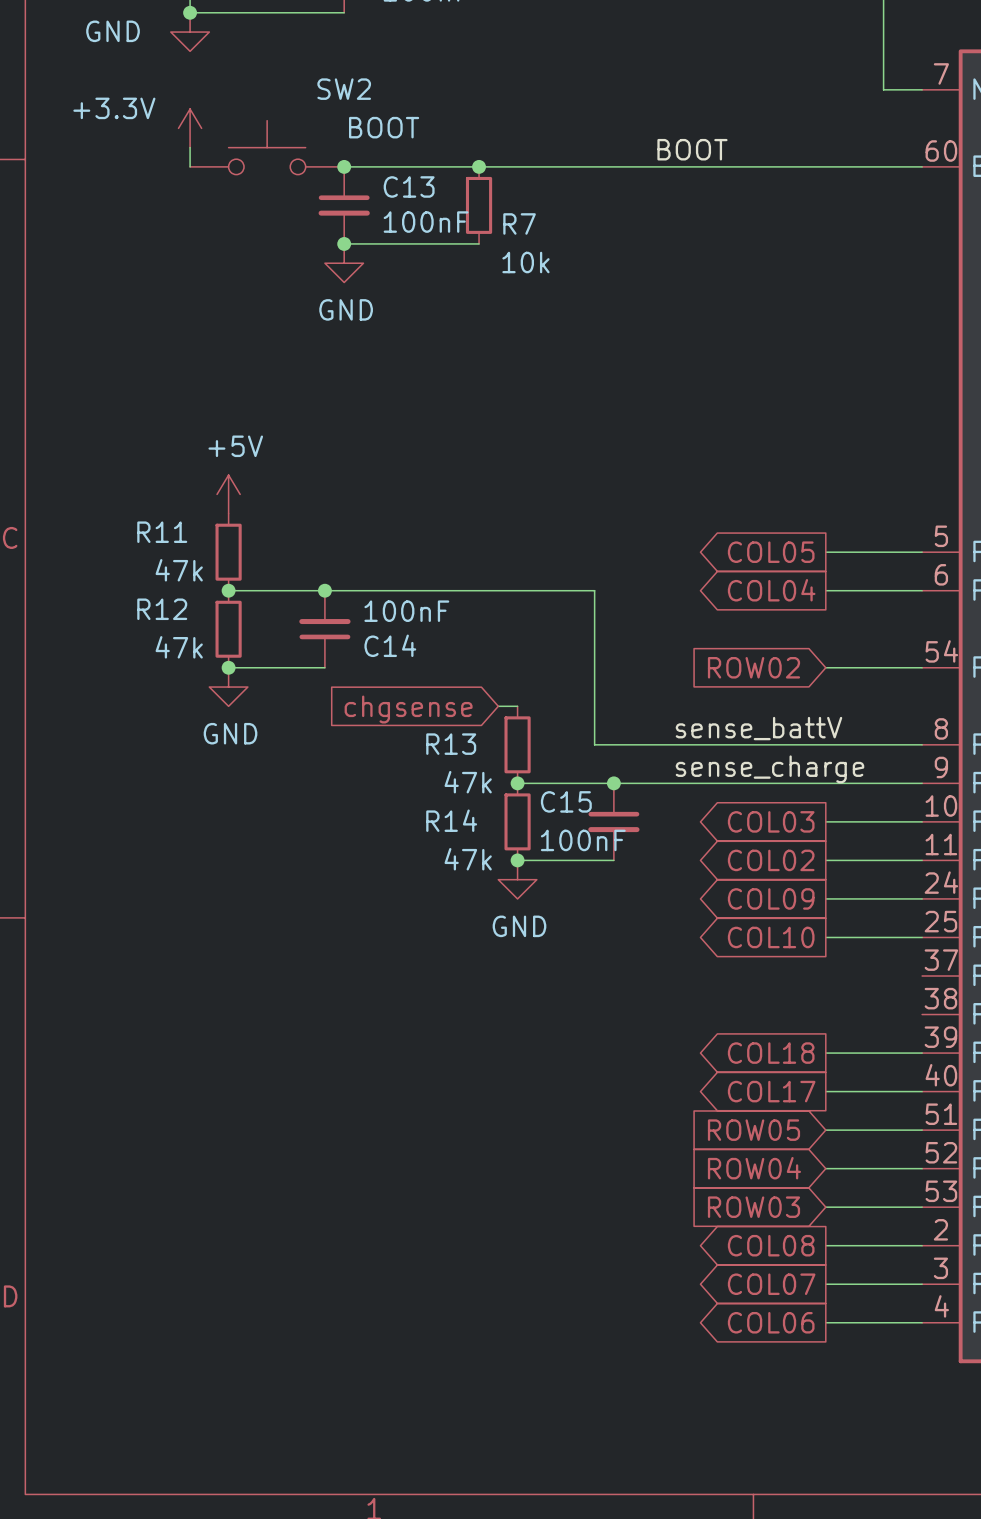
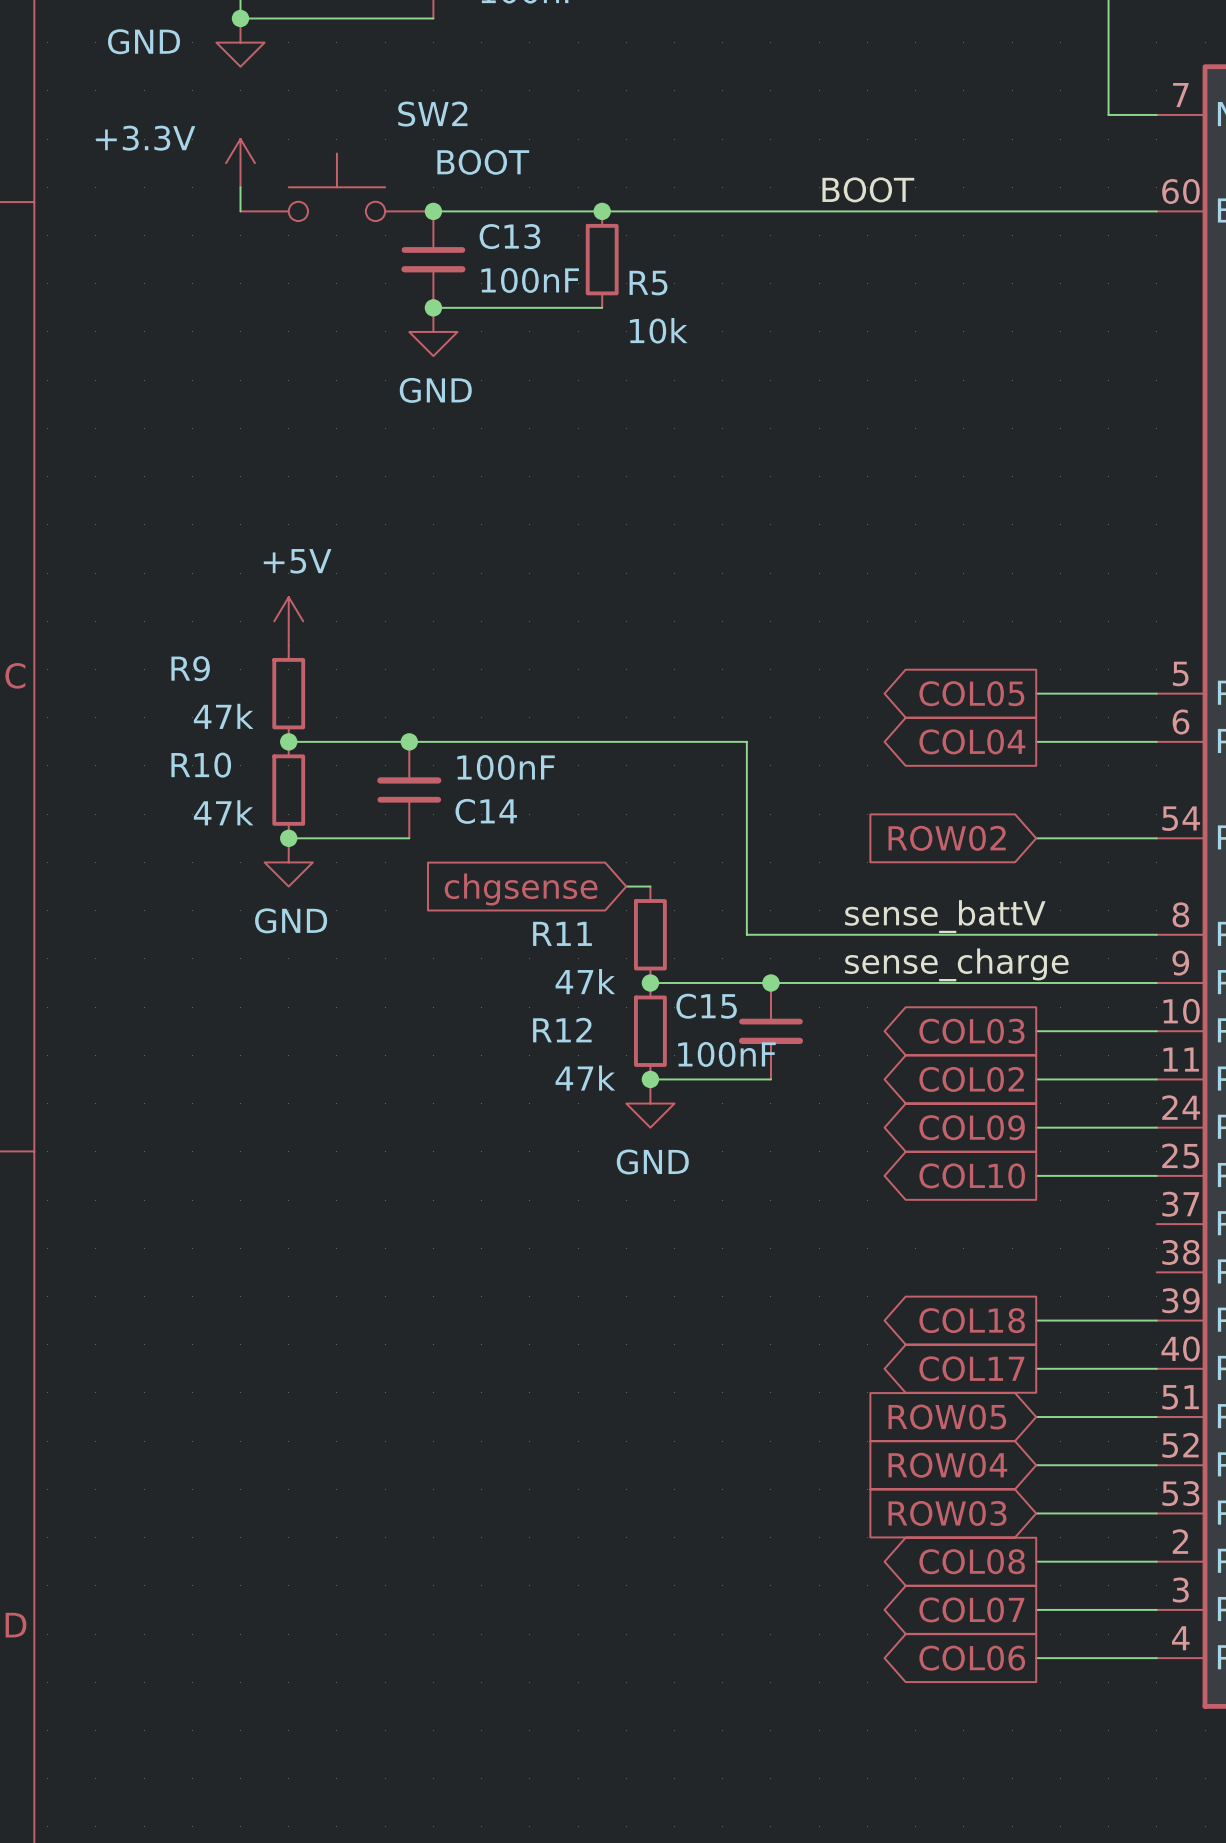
R7 name: R7 (519, 223) -> R5 (648, 283)
R11 name: R11 (162, 532) -> R9 (190, 668)
R12 name: R12 (162, 609) -> R10 (201, 765)
R13 name: R13 (451, 744) -> R11 (562, 933)
R14 name: R14 (451, 820) -> R12 (562, 1030)

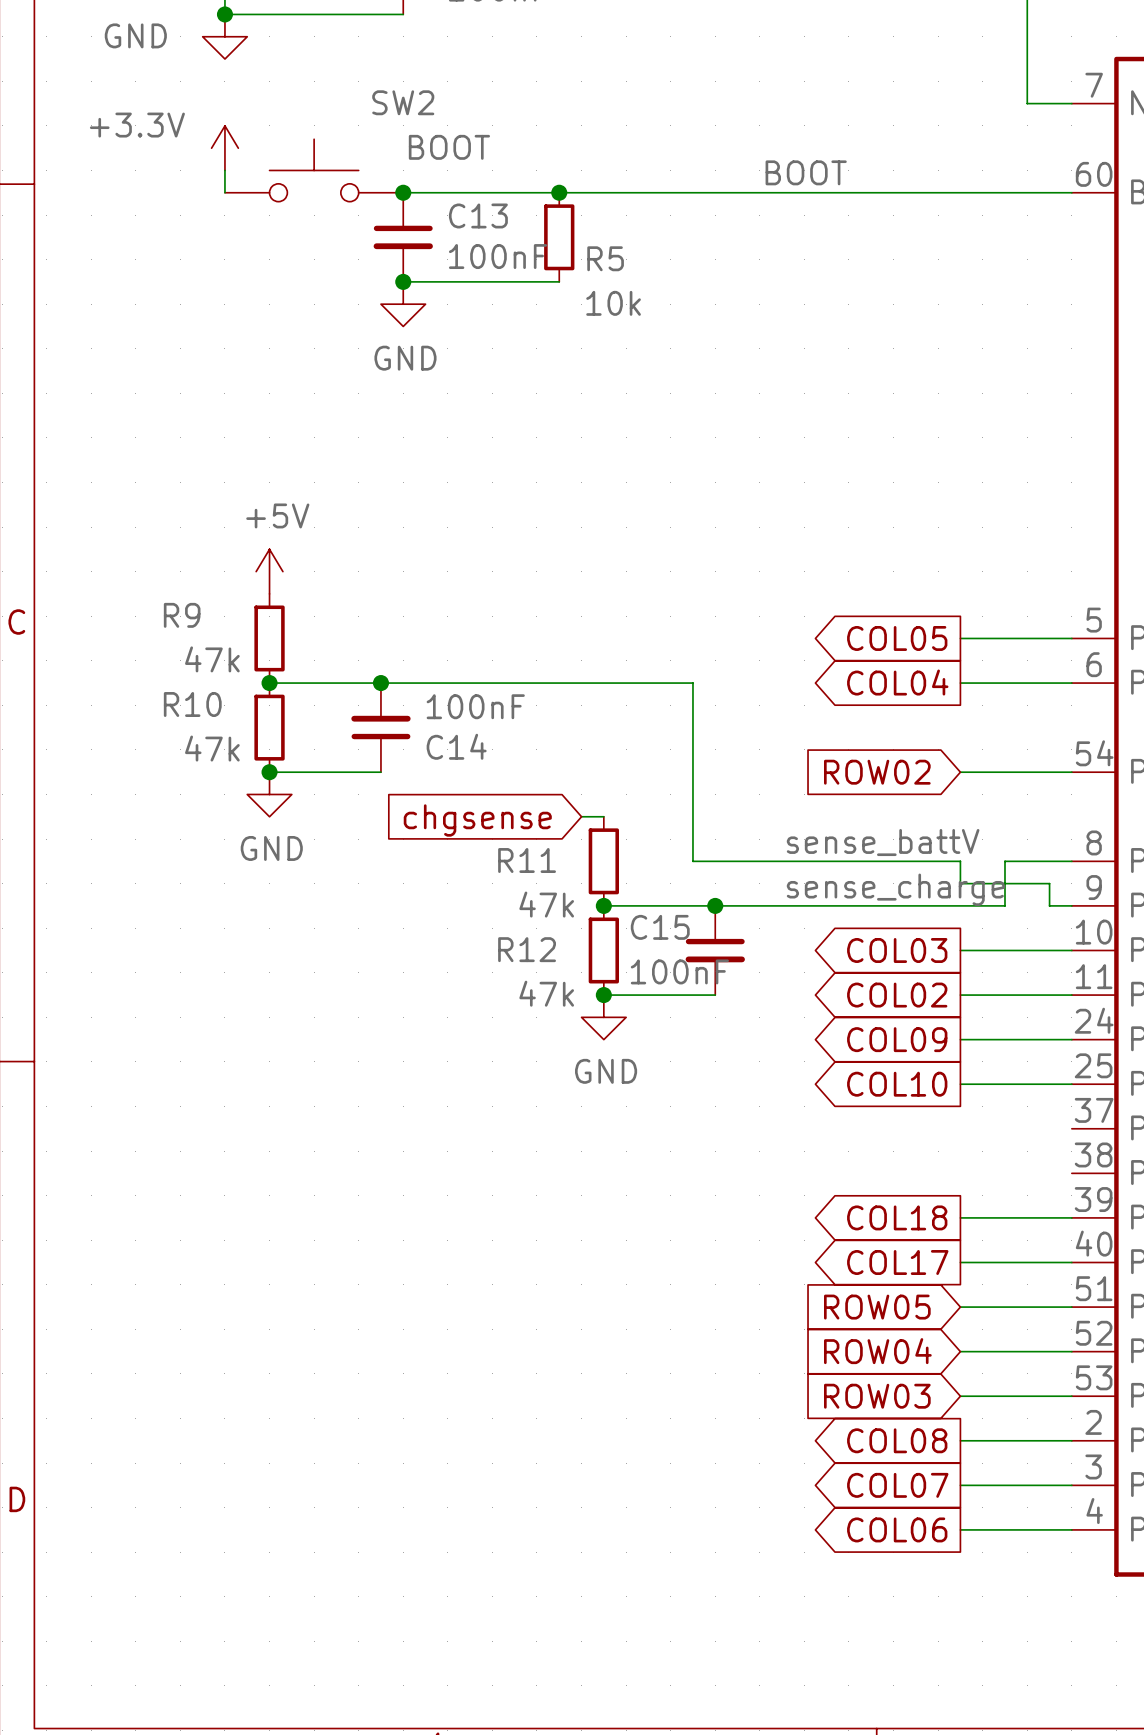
wire: (1036, 934) (1084, 934) -> (960, 861) (960, 883) (1049, 883) (1049, 905)
wire: (1084, 982) (1132, 982) -> (1004, 905) (1004, 861)

